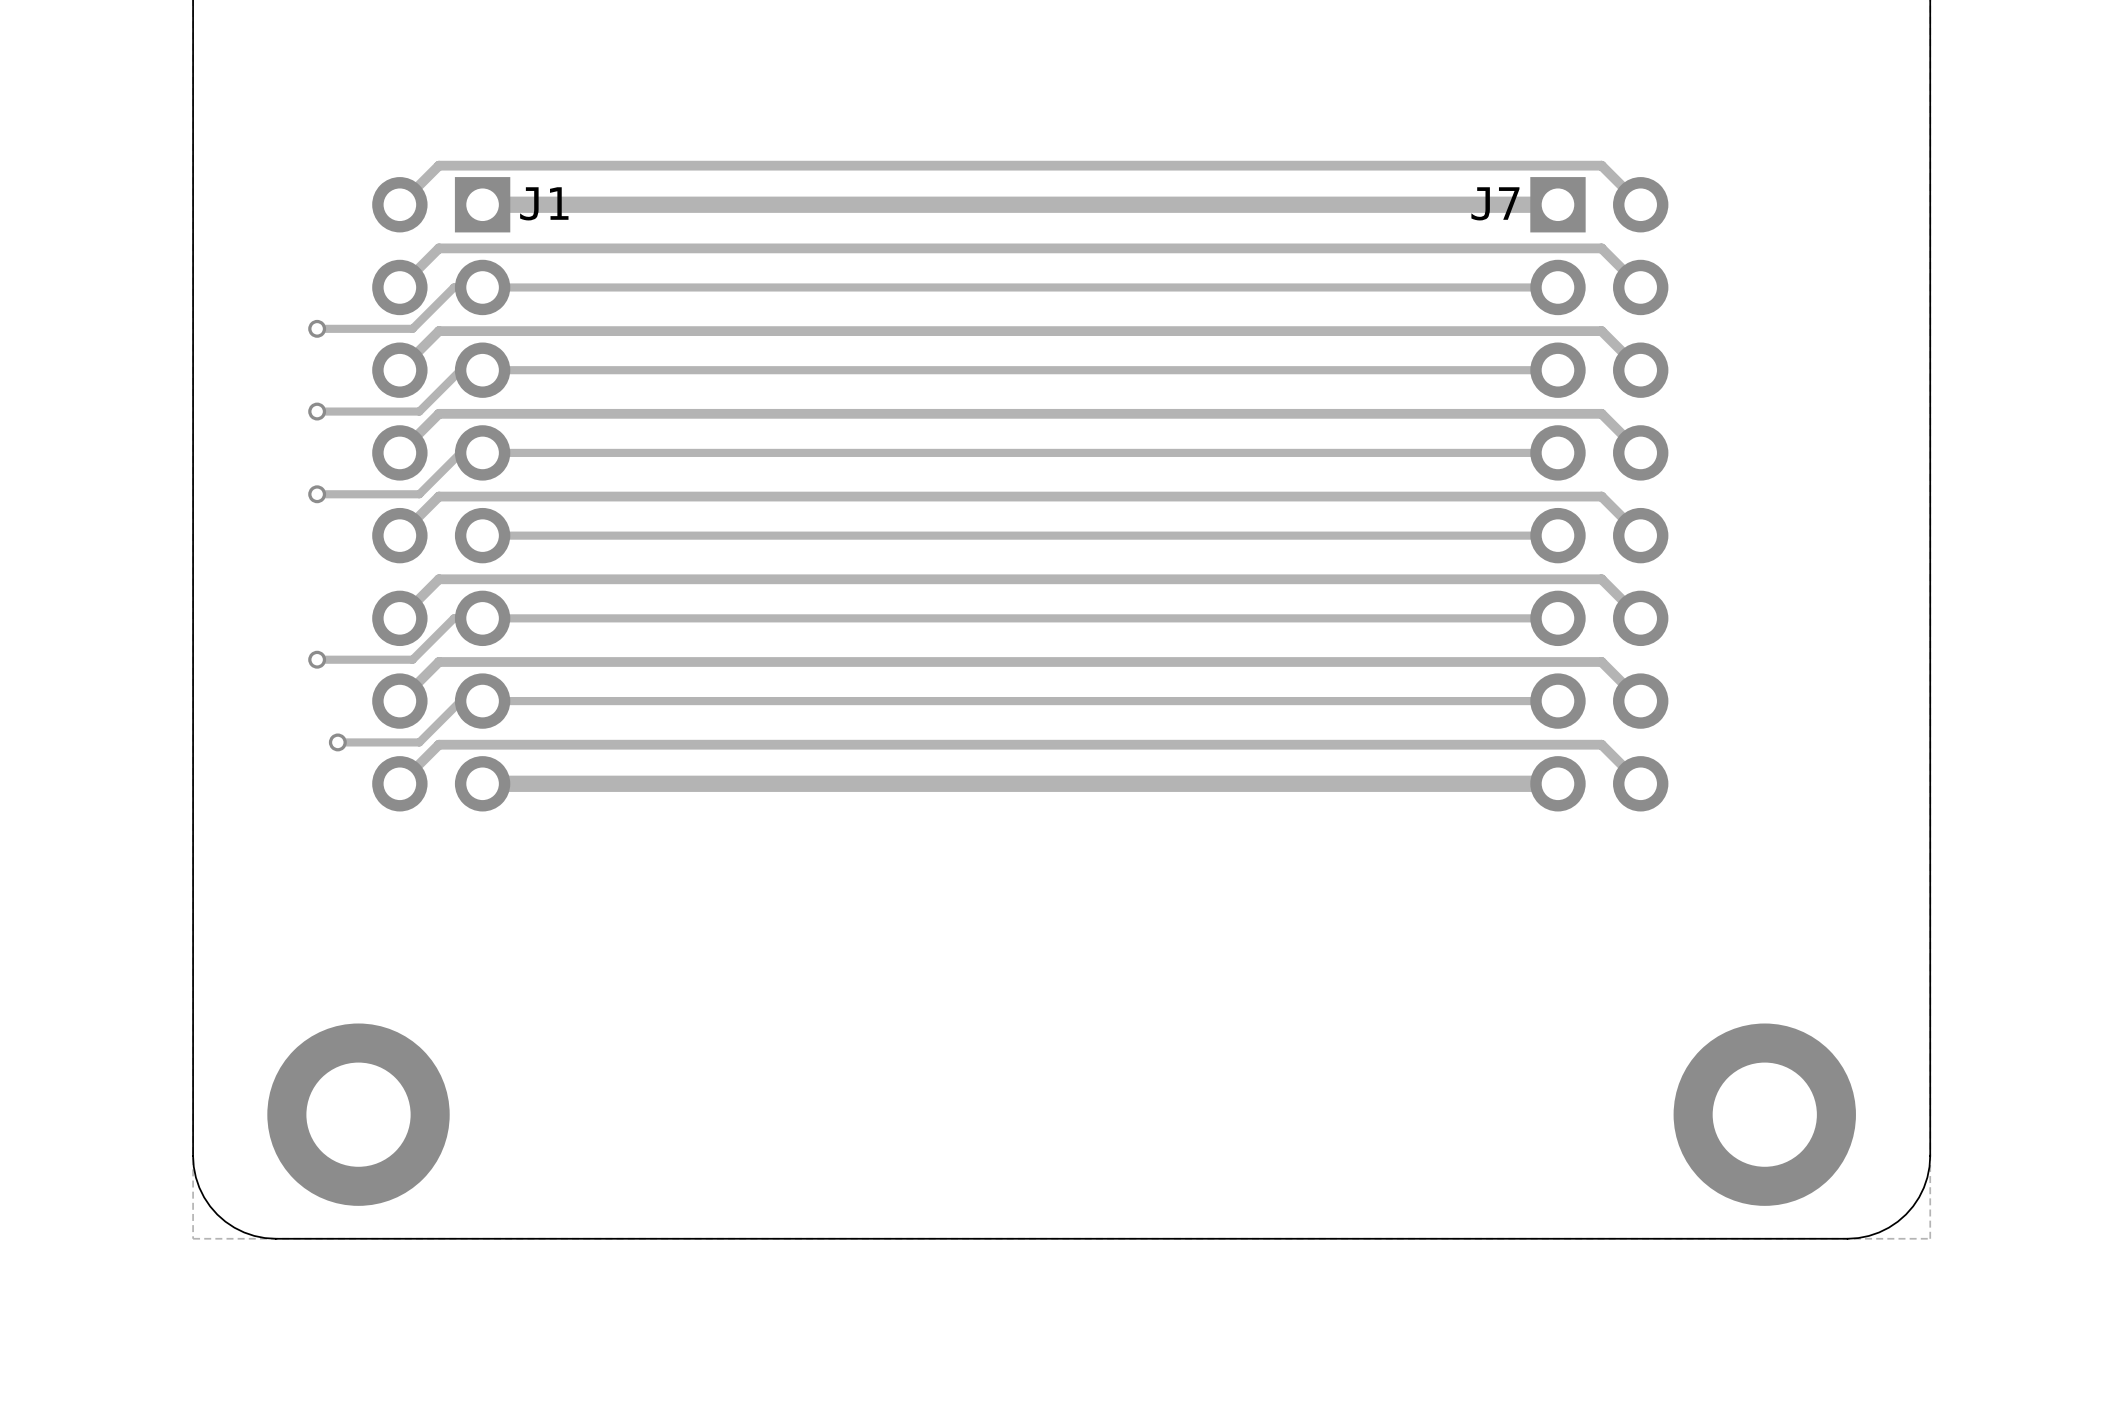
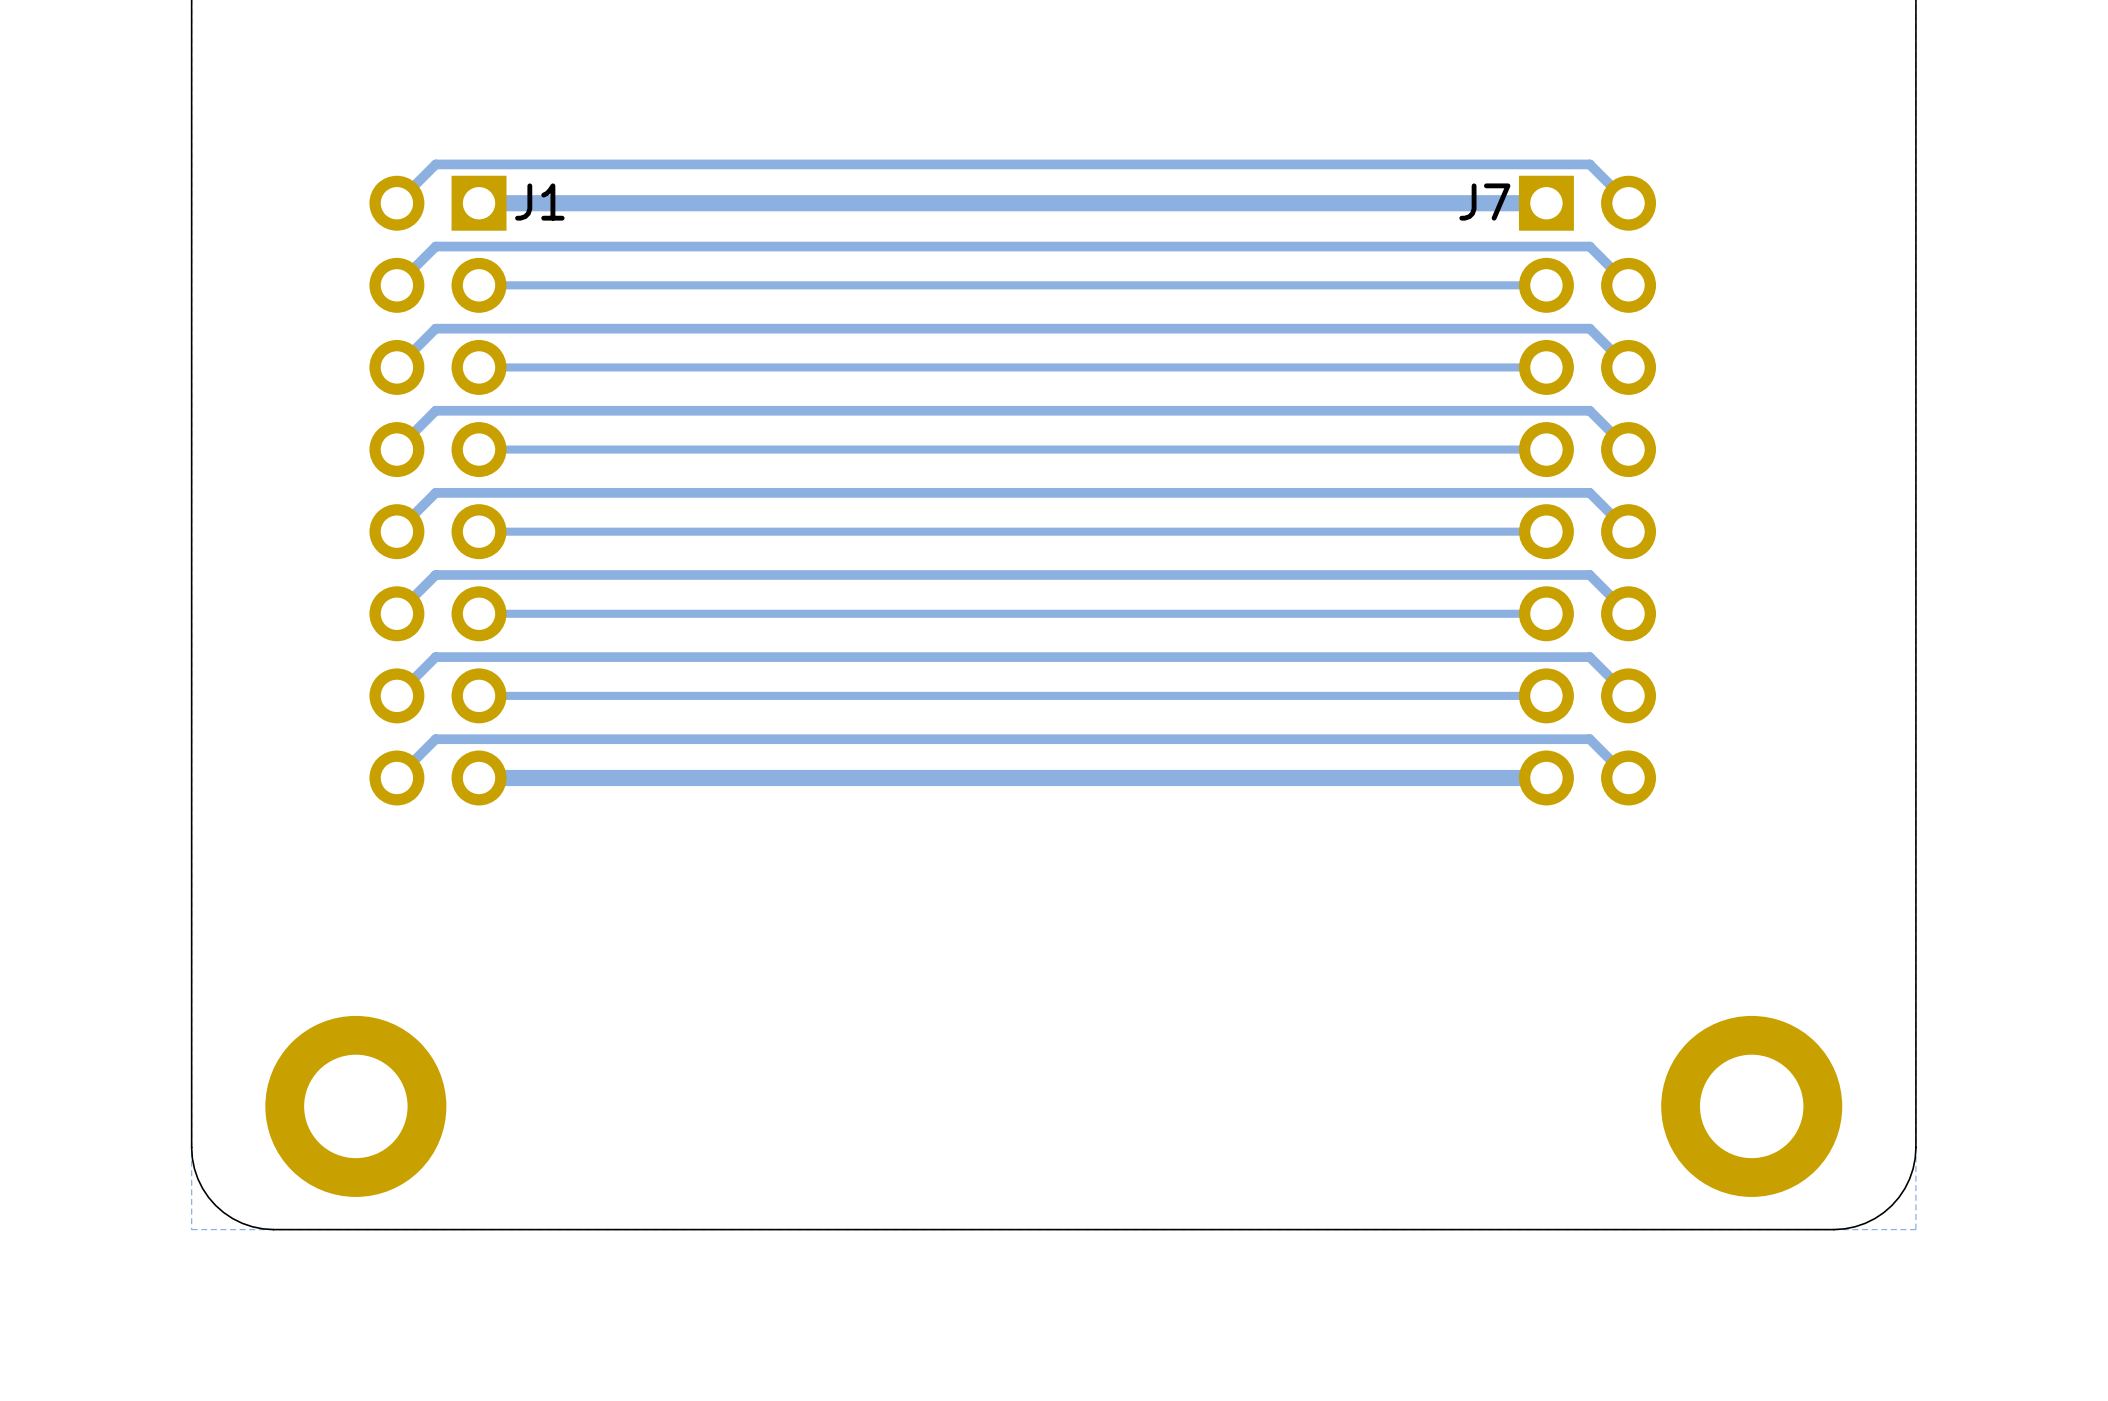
track: (482, 287) (453, 287) (412, 328) (317, 328) -> none
via: (317, 328) -> none
track: (482, 370) (460, 370) (419, 411) (317, 411) -> none
via: (317, 411) -> none
track: (482, 452) (460, 452) (419, 494) (317, 494) -> none
via: (317, 494) -> none
track: (482, 618) (453, 618) (412, 659) (317, 659) -> none
via: (317, 659) -> none
track: (482, 701) (460, 701) (419, 742) (337, 742) -> none
via: (337, 742) -> none

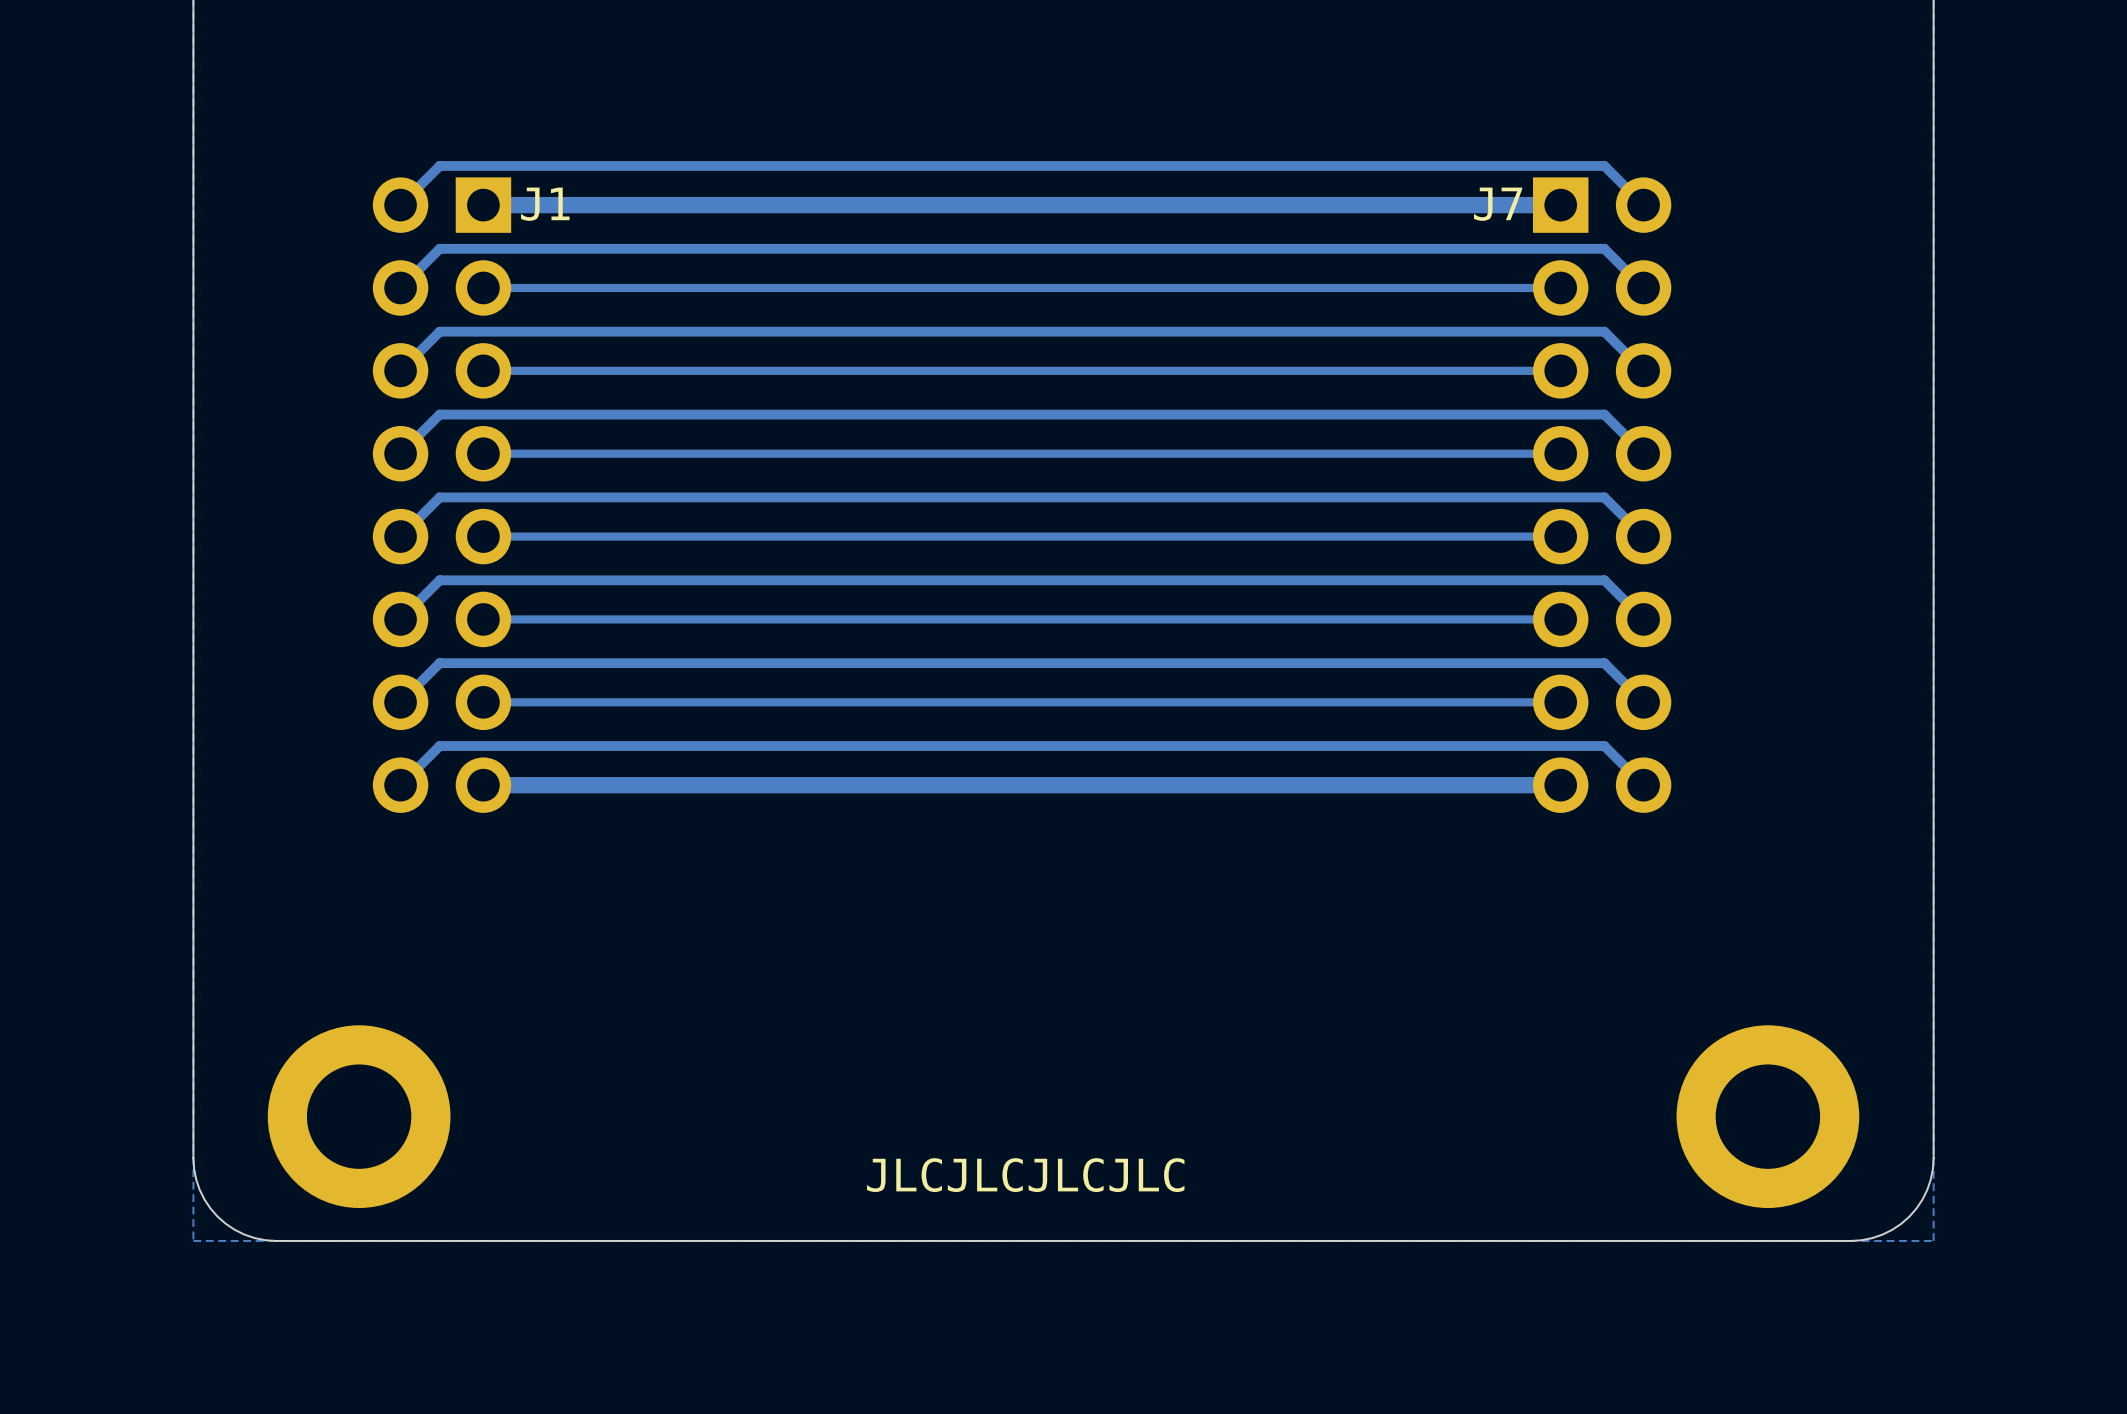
text: none -> JLCJLCJLCJLC (1025, 1175)

